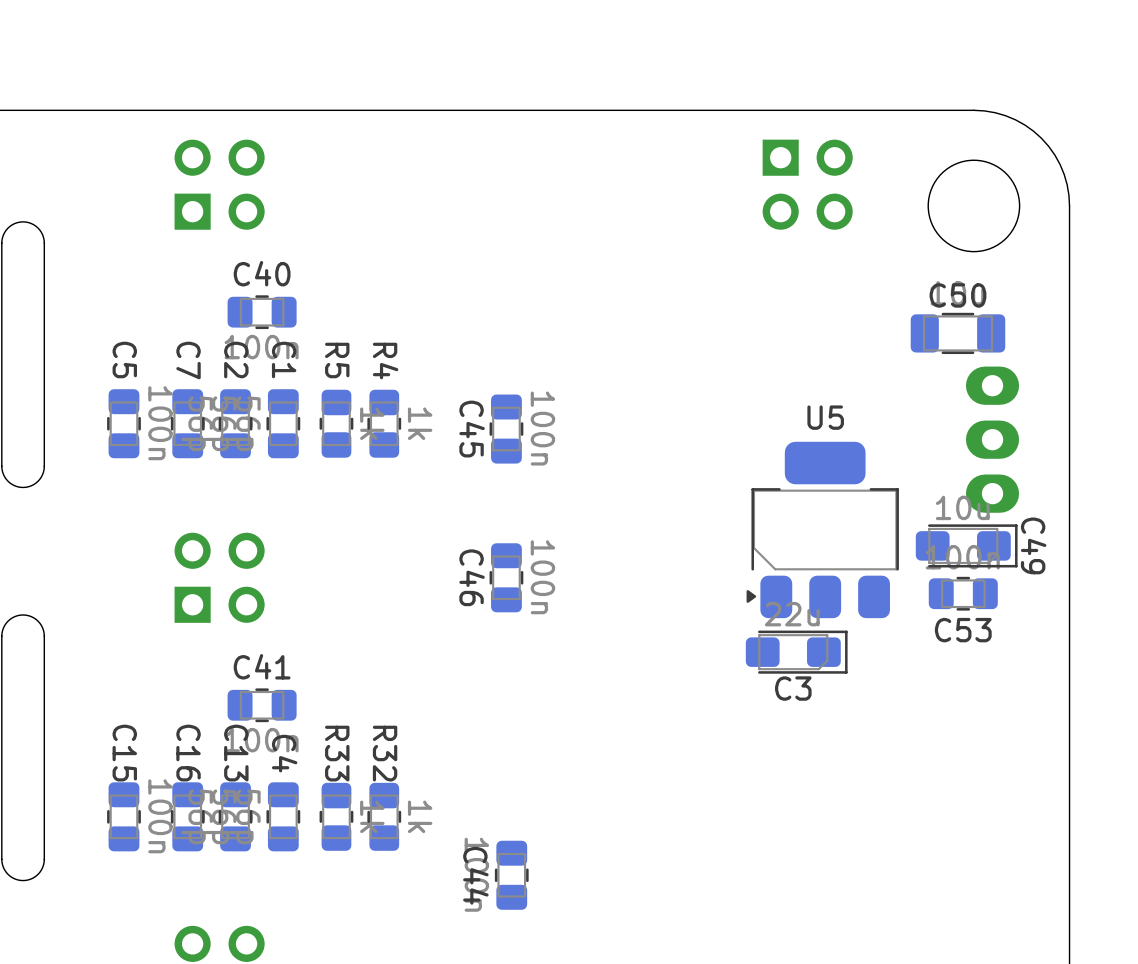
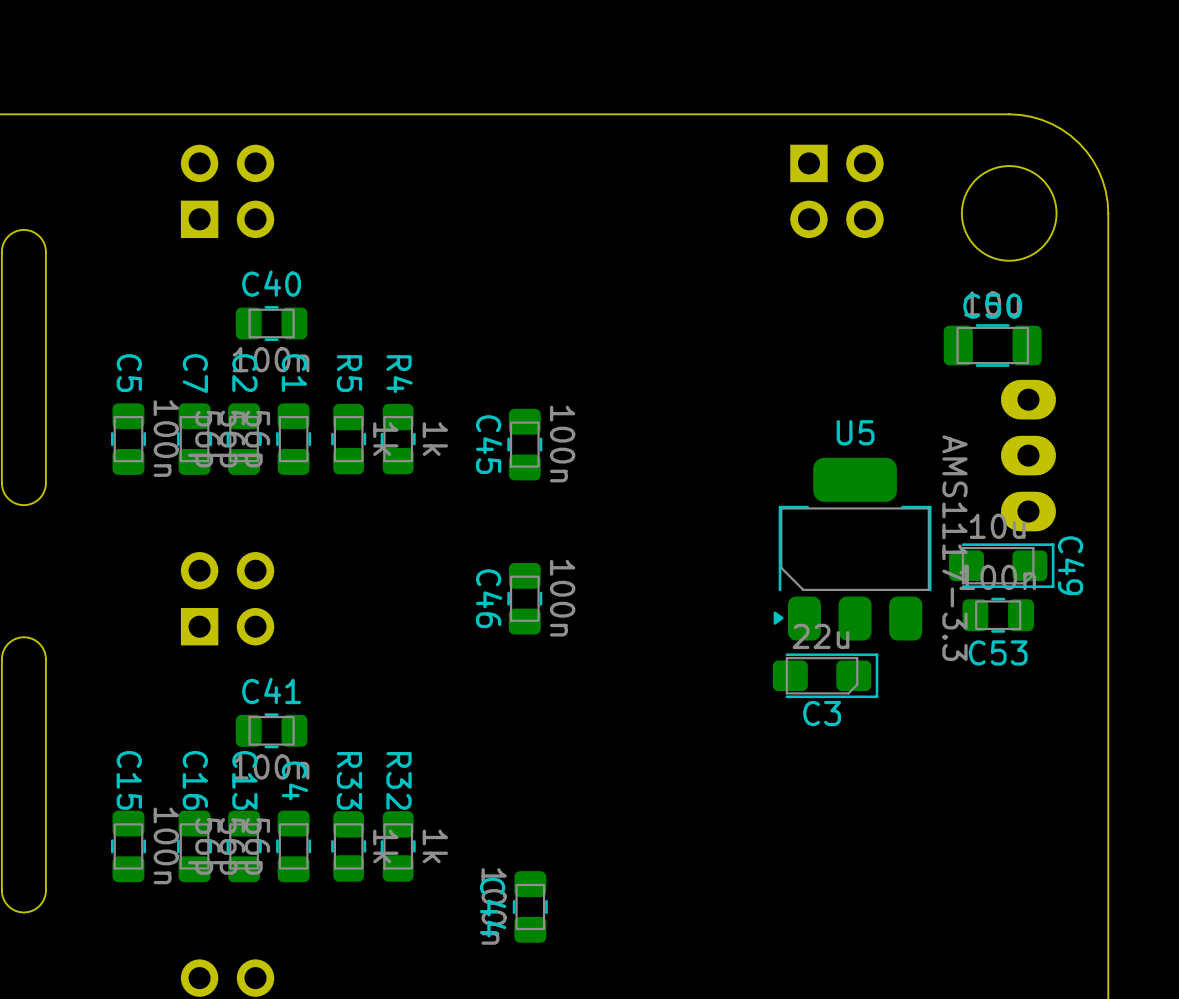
U5 value: none -> AMS1117-3.3 (954, 548)

